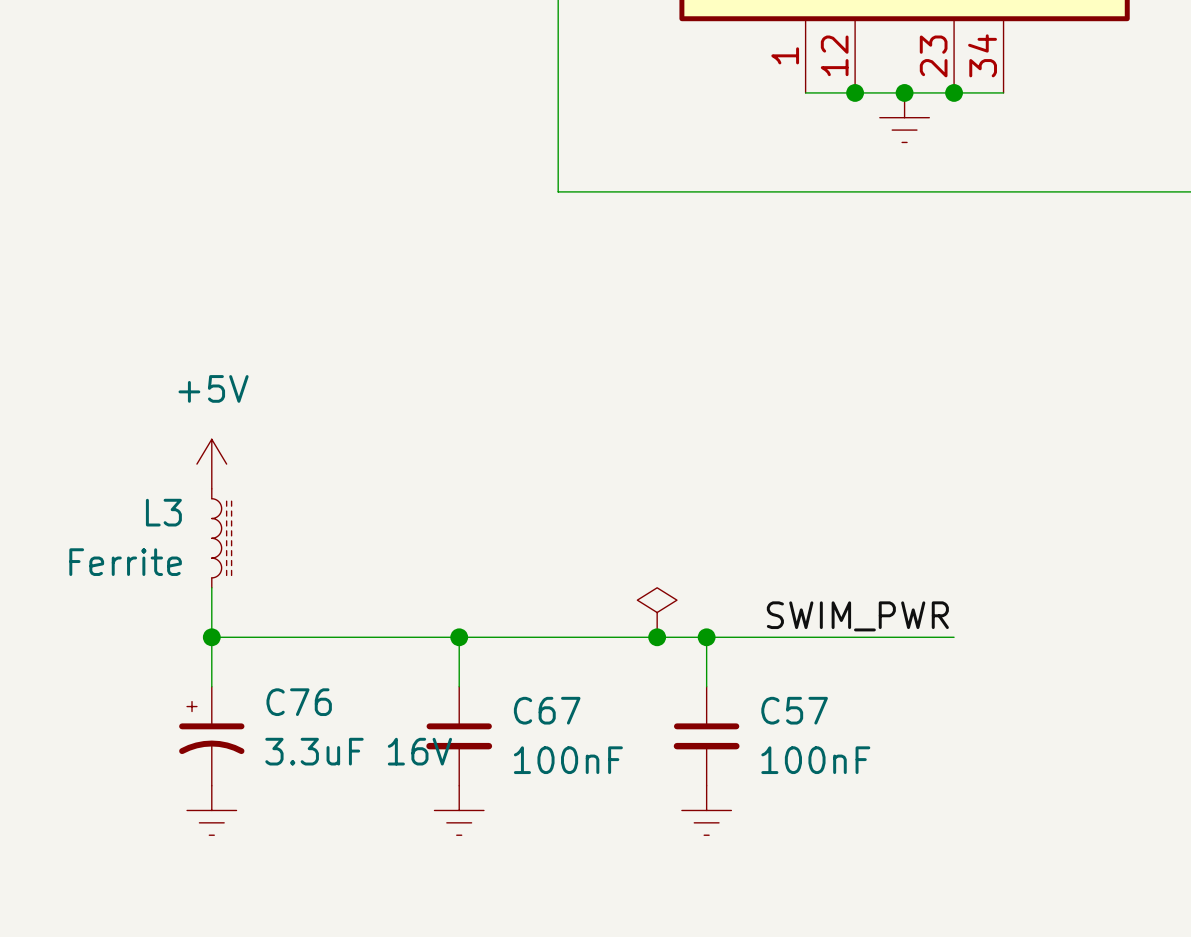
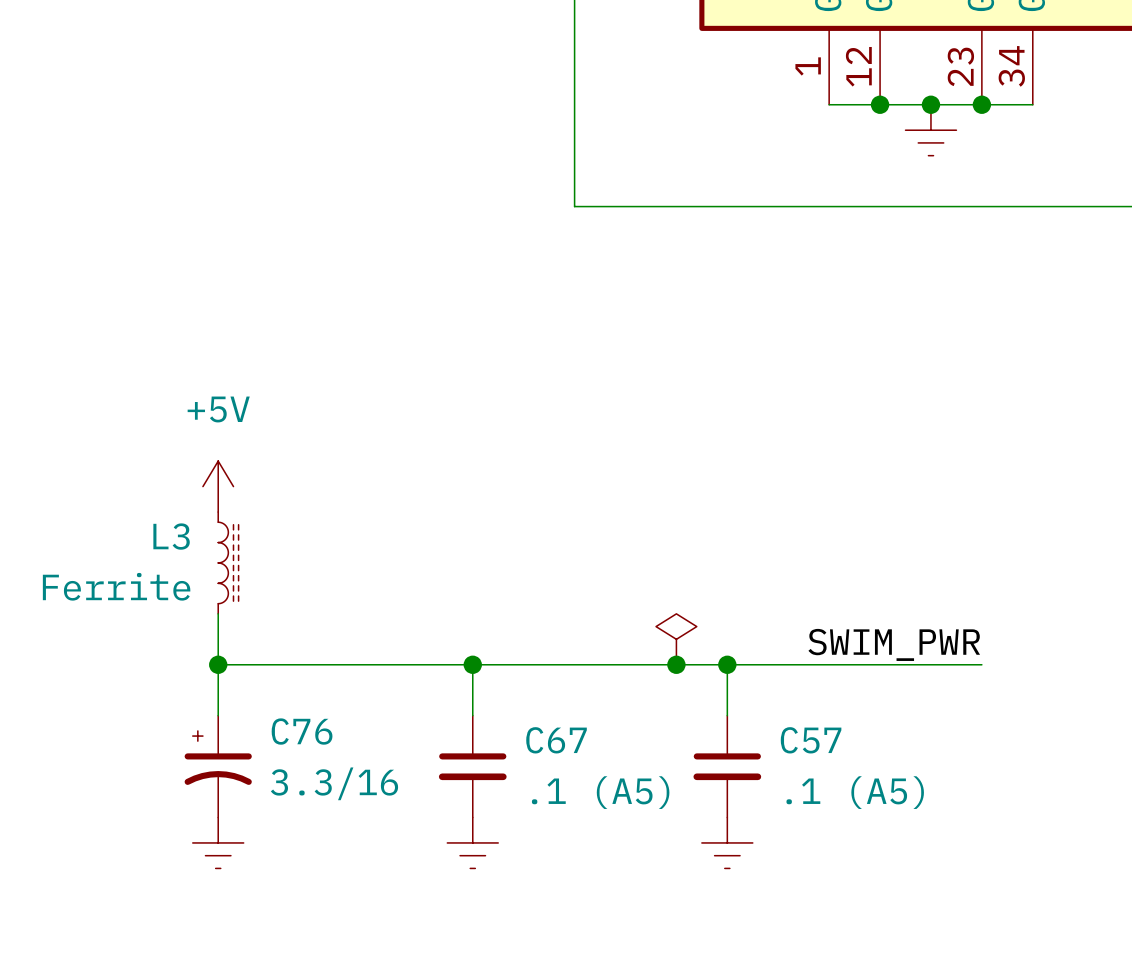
C76 value: 3.3uF 16V (358, 751) -> 3.3/16 (334, 783)
C67 value: 100nF (568, 760) -> .1 (A5) (600, 792)
C57 value: 100nF (815, 760) -> .1 (A5) (855, 792)

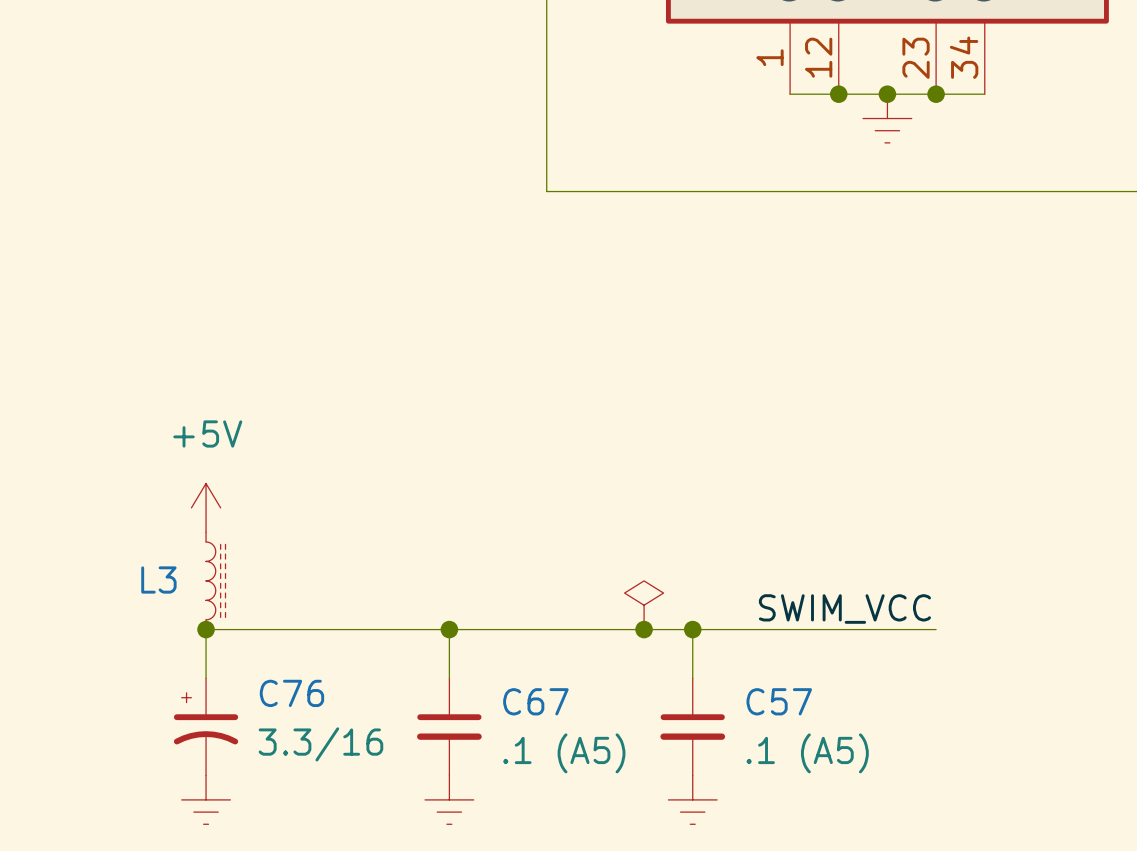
power symbol position: +5V (218, 486) -> +5V (206, 507)
L3 name position: L3 (171, 536) -> L3 (158, 579)
L3 position: (228, 562) -> (215, 580)
L3 value: Ferrite (116, 586) -> none
wire: (218, 613) (218, 664) -> none
label: SWIM_PWR (894, 644) -> SWIM_VCC (844, 609)

